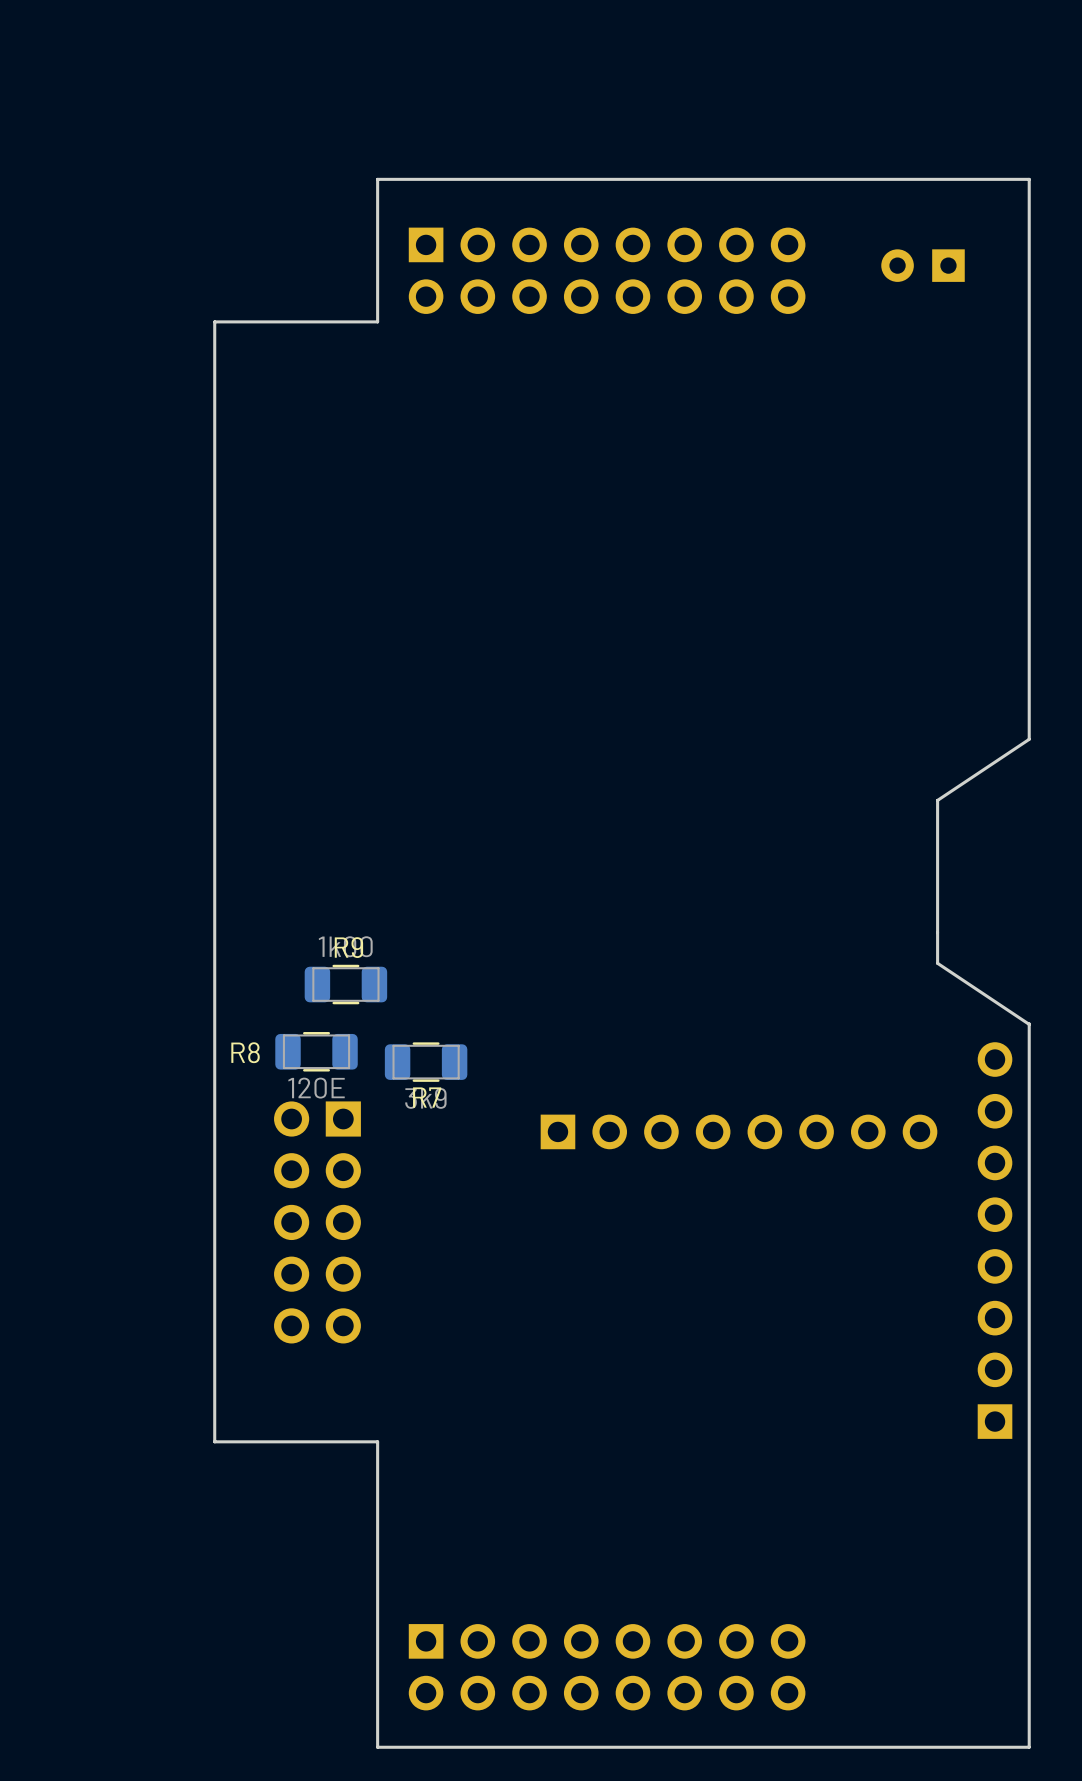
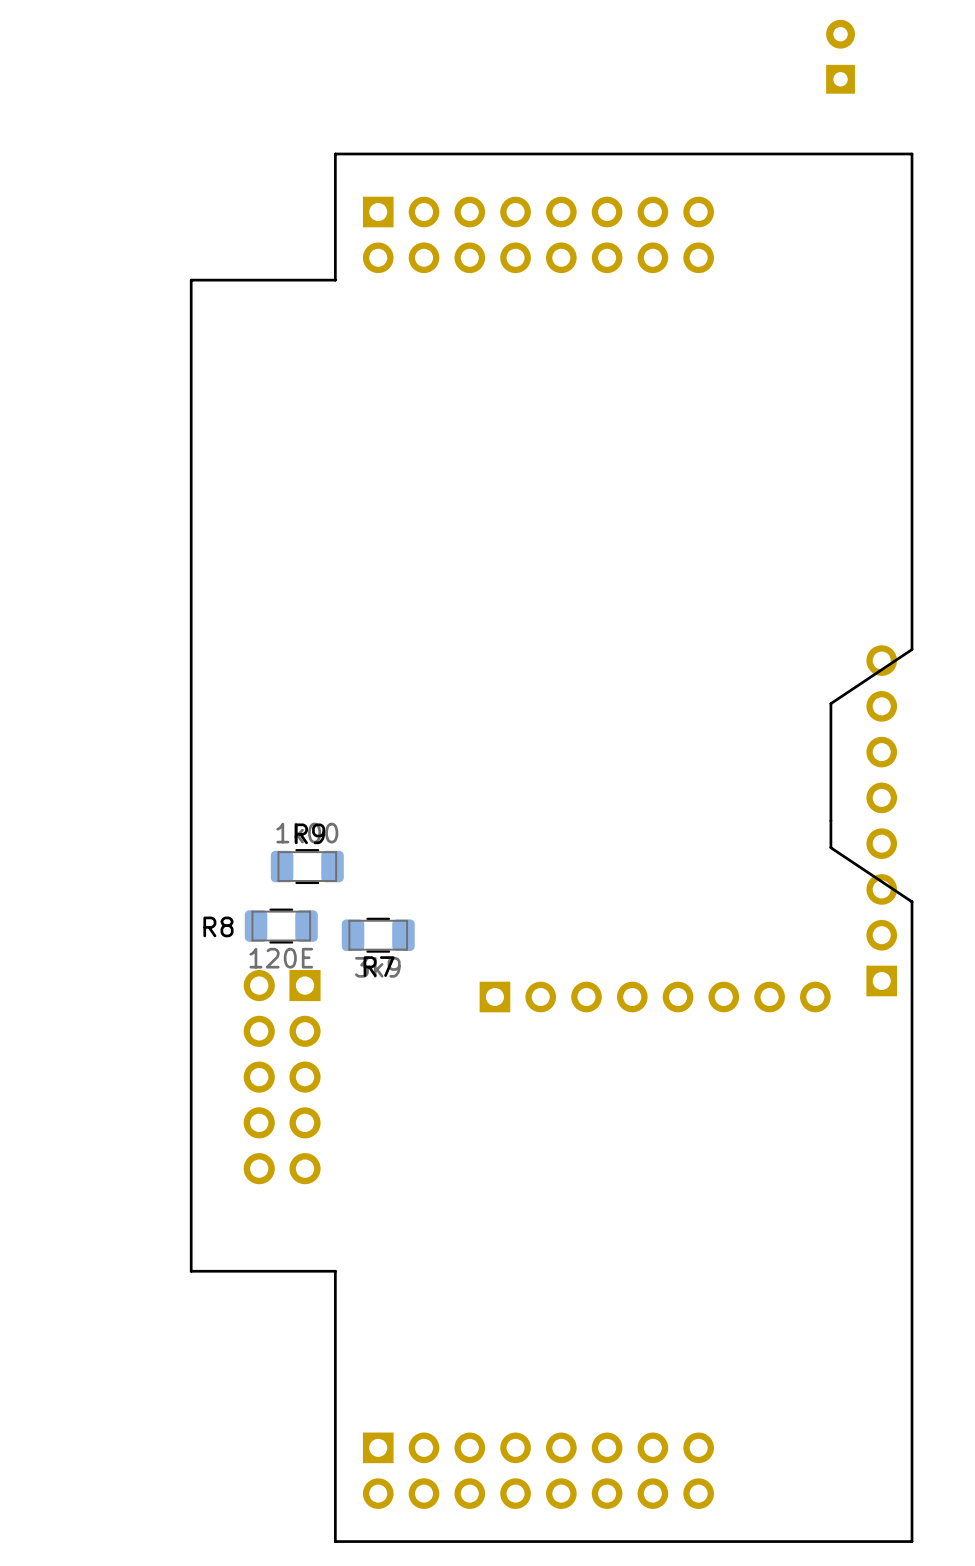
part rotation: 0° (923, 265) -> 90° clockwise (840, 56)
part position: (923, 265) -> (840, 56)
part position: (995, 1240) -> (881, 820)

